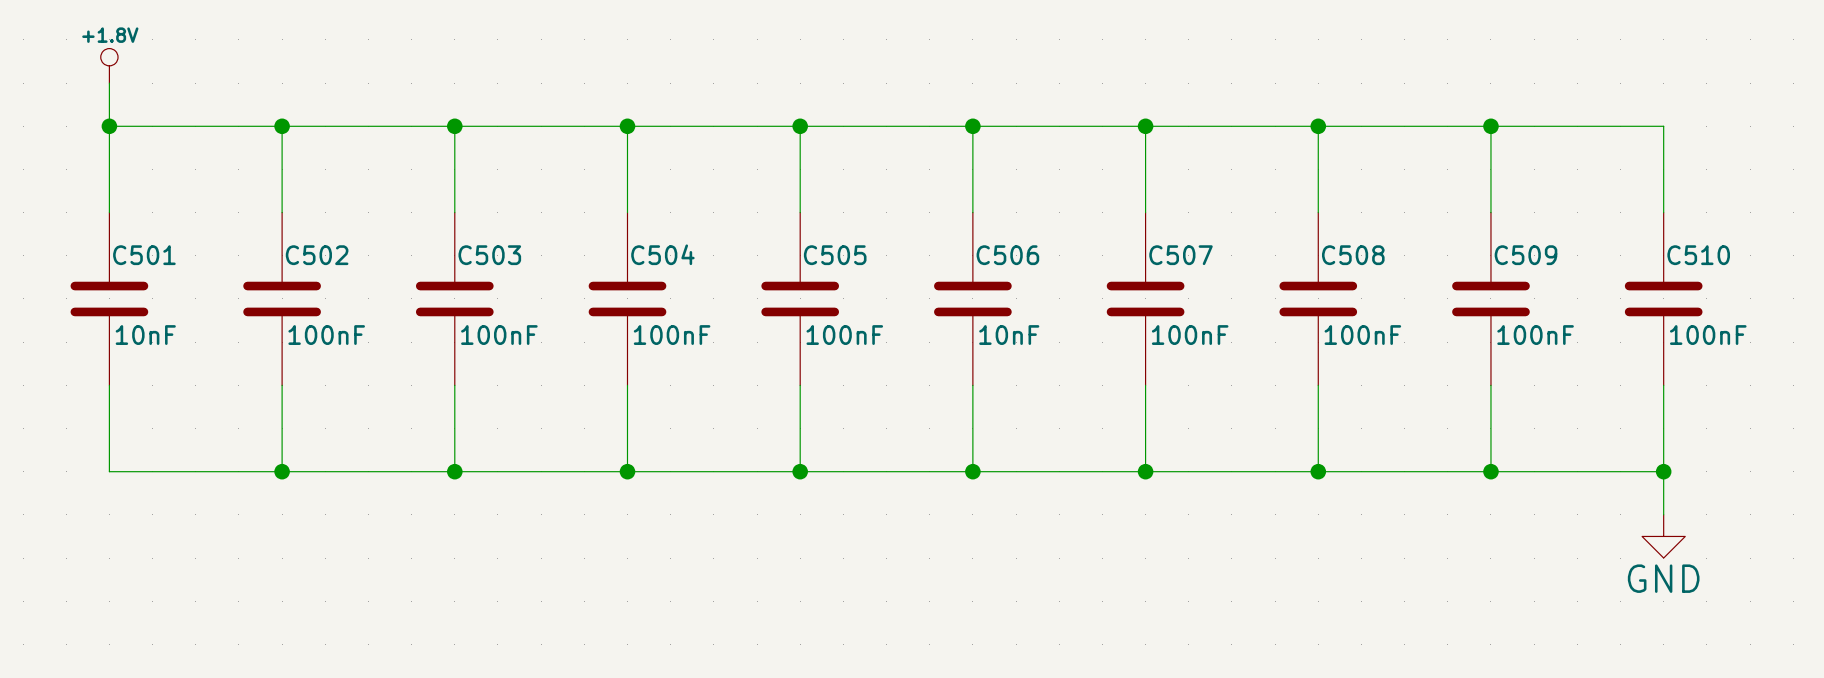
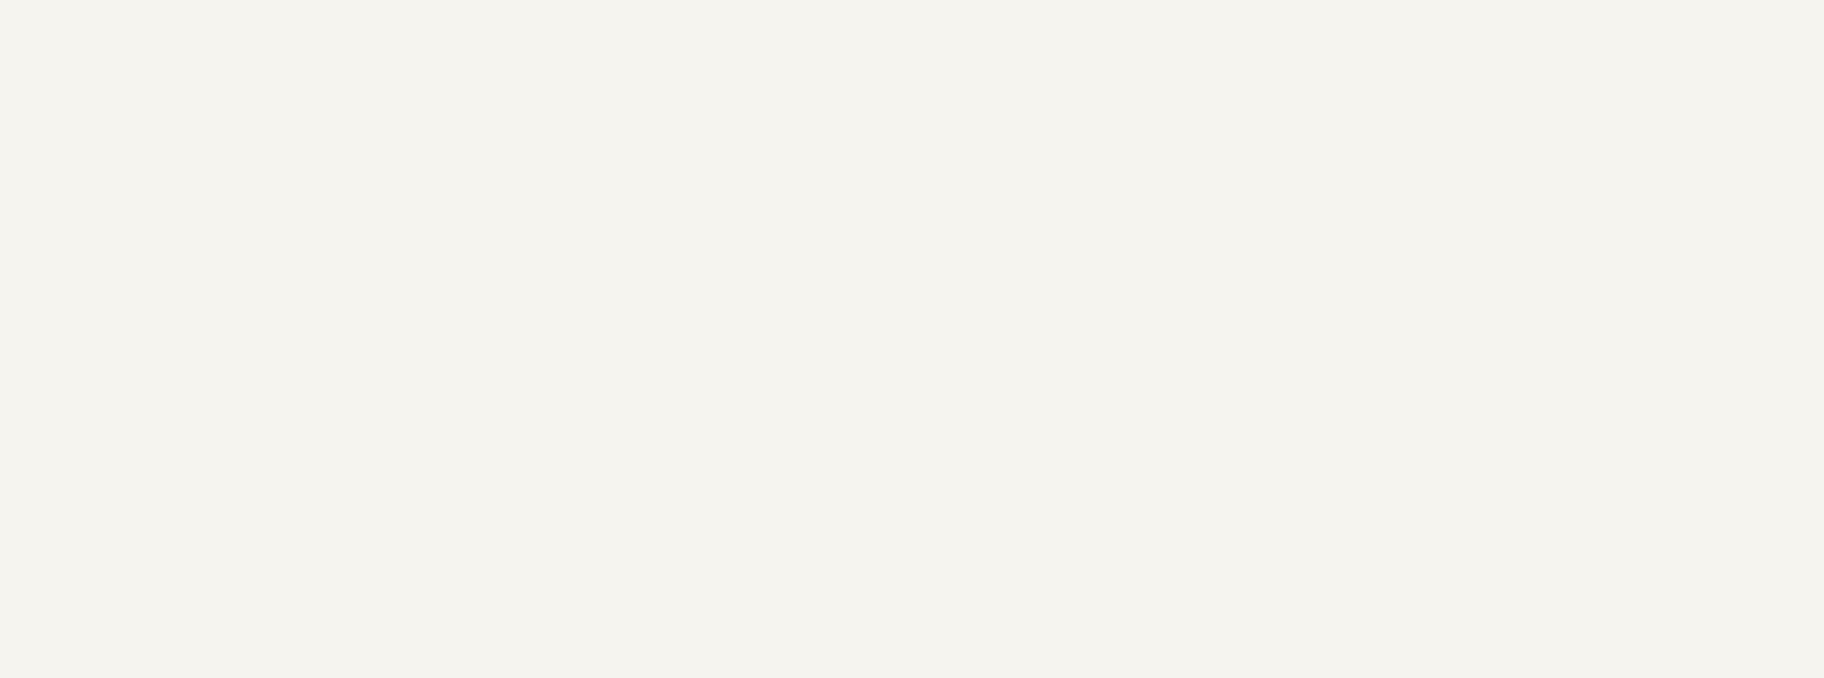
power symbol: +1.8V (109, 65) -> none
wire: (109, 83) (109, 212) -> none
wire: (109, 126) (1663, 126) (1663, 212) -> none
junction: (109, 126) -> none
wire: (282, 126) (282, 212) -> none
junction: (282, 126) -> none
wire: (454, 126) (454, 212) -> none
junction: (454, 126) -> none
wire: (627, 126) (627, 212) -> none
junction: (627, 126) -> none
wire: (800, 126) (800, 212) -> none
junction: (800, 126) -> none
wire: (972, 126) (972, 212) -> none
junction: (972, 126) -> none
wire: (1145, 126) (1145, 212) -> none
junction: (1145, 126) -> none
wire: (1318, 126) (1318, 212) -> none
junction: (1318, 126) -> none
wire: (1490, 126) (1490, 212) -> none
junction: (1490, 126) -> none
C501: 10nF (109, 298) -> none
C502: 100nF (282, 298) -> none
C503: 100nF (454, 298) -> none
C504: 100nF (627, 298) -> none
C505: 100nF (800, 298) -> none
C506: 10nF (972, 298) -> none
C507: 100nF (1145, 298) -> none
C508: 100nF (1318, 298) -> none
C509: 100nF (1490, 298) -> none
C510: 100nF (1663, 298) -> none
wire: (109, 385) (109, 471) (1663, 471) -> none
wire: (282, 385) (282, 471) -> none
wire: (454, 385) (454, 471) -> none
wire: (627, 385) (627, 471) -> none
wire: (800, 385) (800, 471) -> none
wire: (972, 385) (972, 471) -> none
wire: (1145, 385) (1145, 471) -> none
wire: (1318, 385) (1318, 471) -> none
wire: (1490, 385) (1490, 471) -> none
wire: (1663, 385) (1663, 514) -> none
junction: (282, 471) -> none
junction: (454, 471) -> none
junction: (627, 471) -> none
junction: (800, 471) -> none
junction: (972, 471) -> none
junction: (1145, 471) -> none
junction: (1318, 471) -> none
junction: (1490, 471) -> none
junction: (1663, 471) -> none
power symbol: GND (1663, 536) -> none

